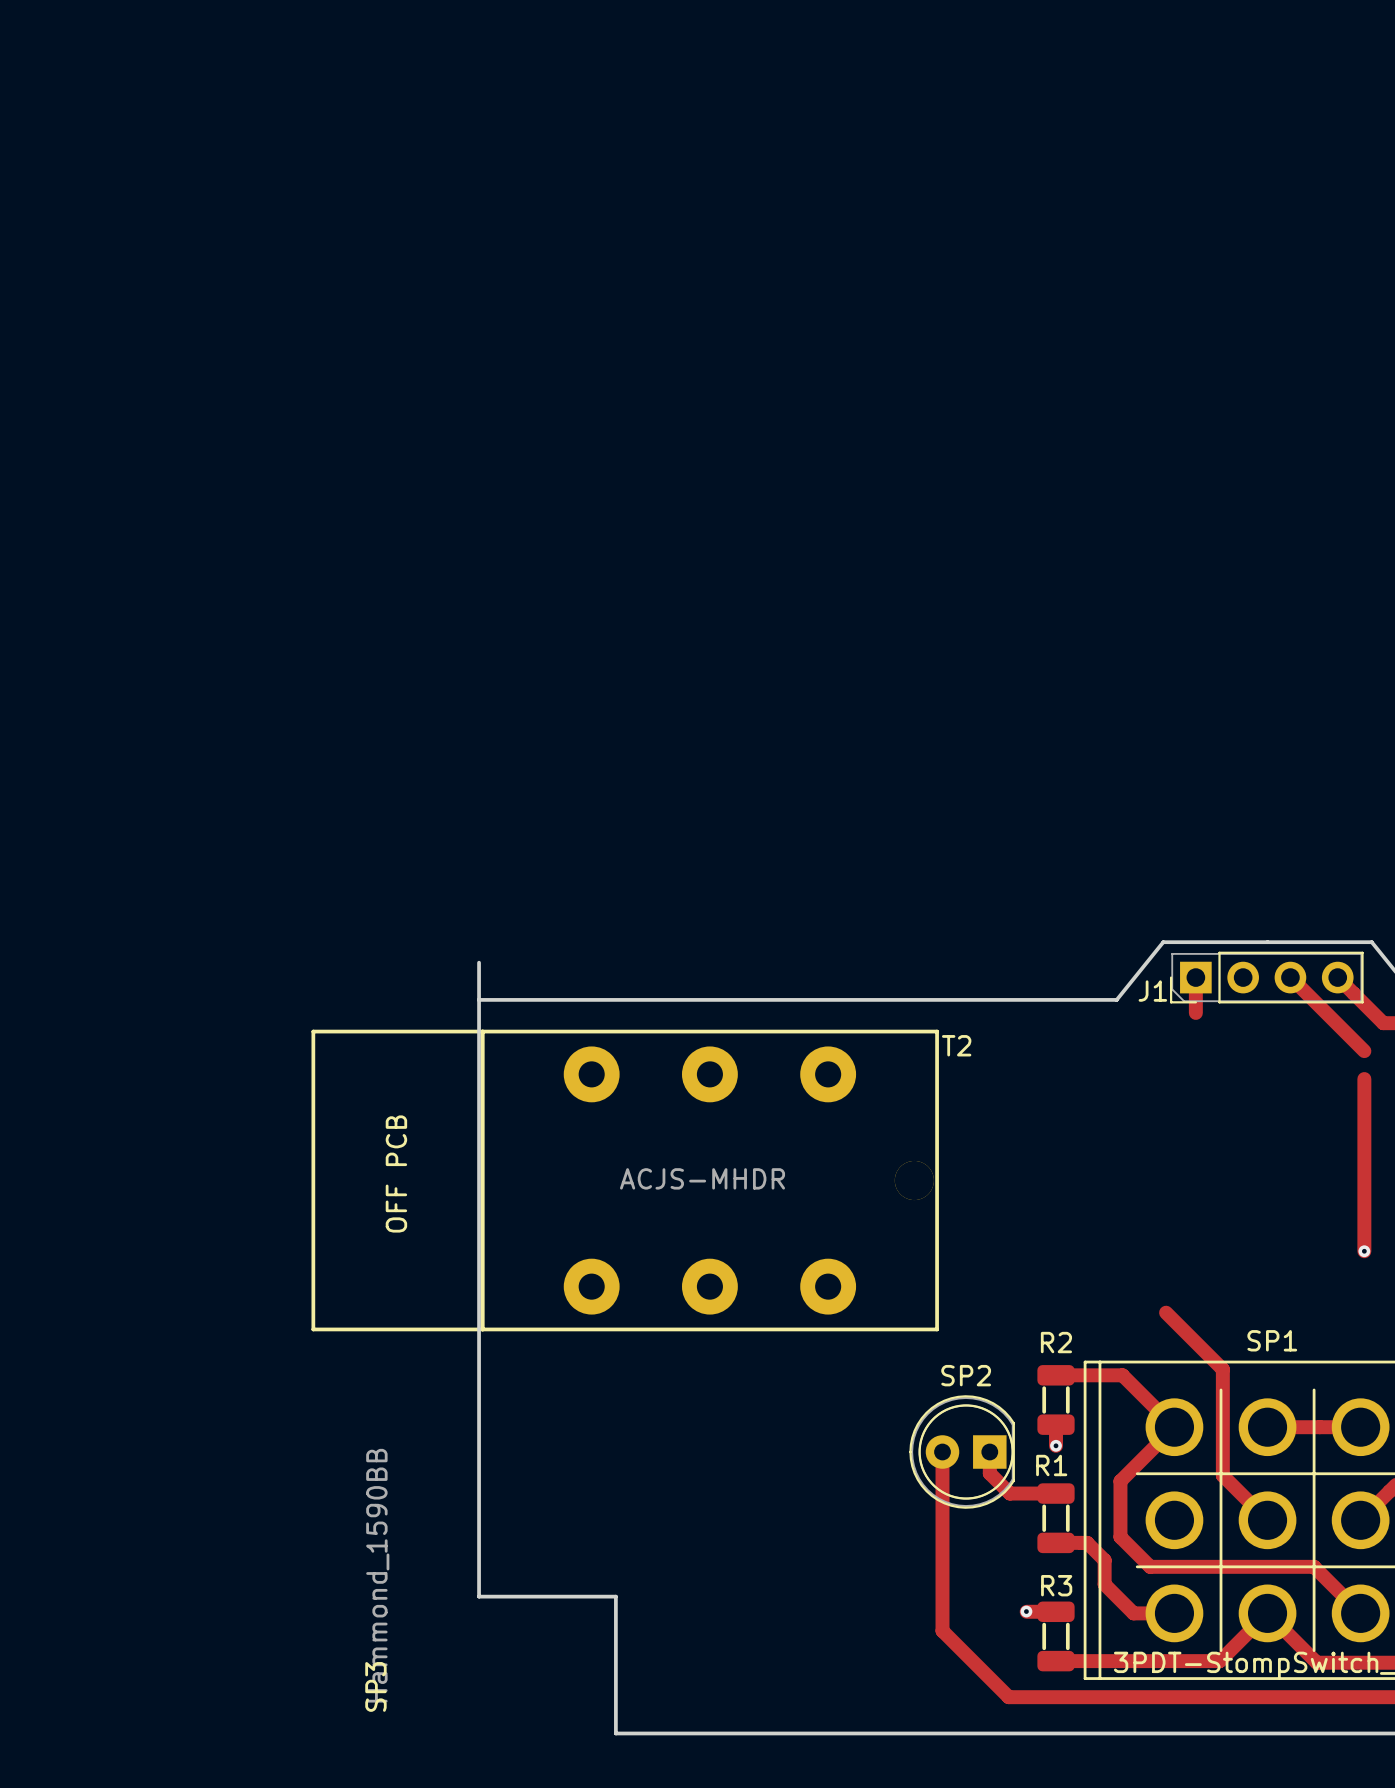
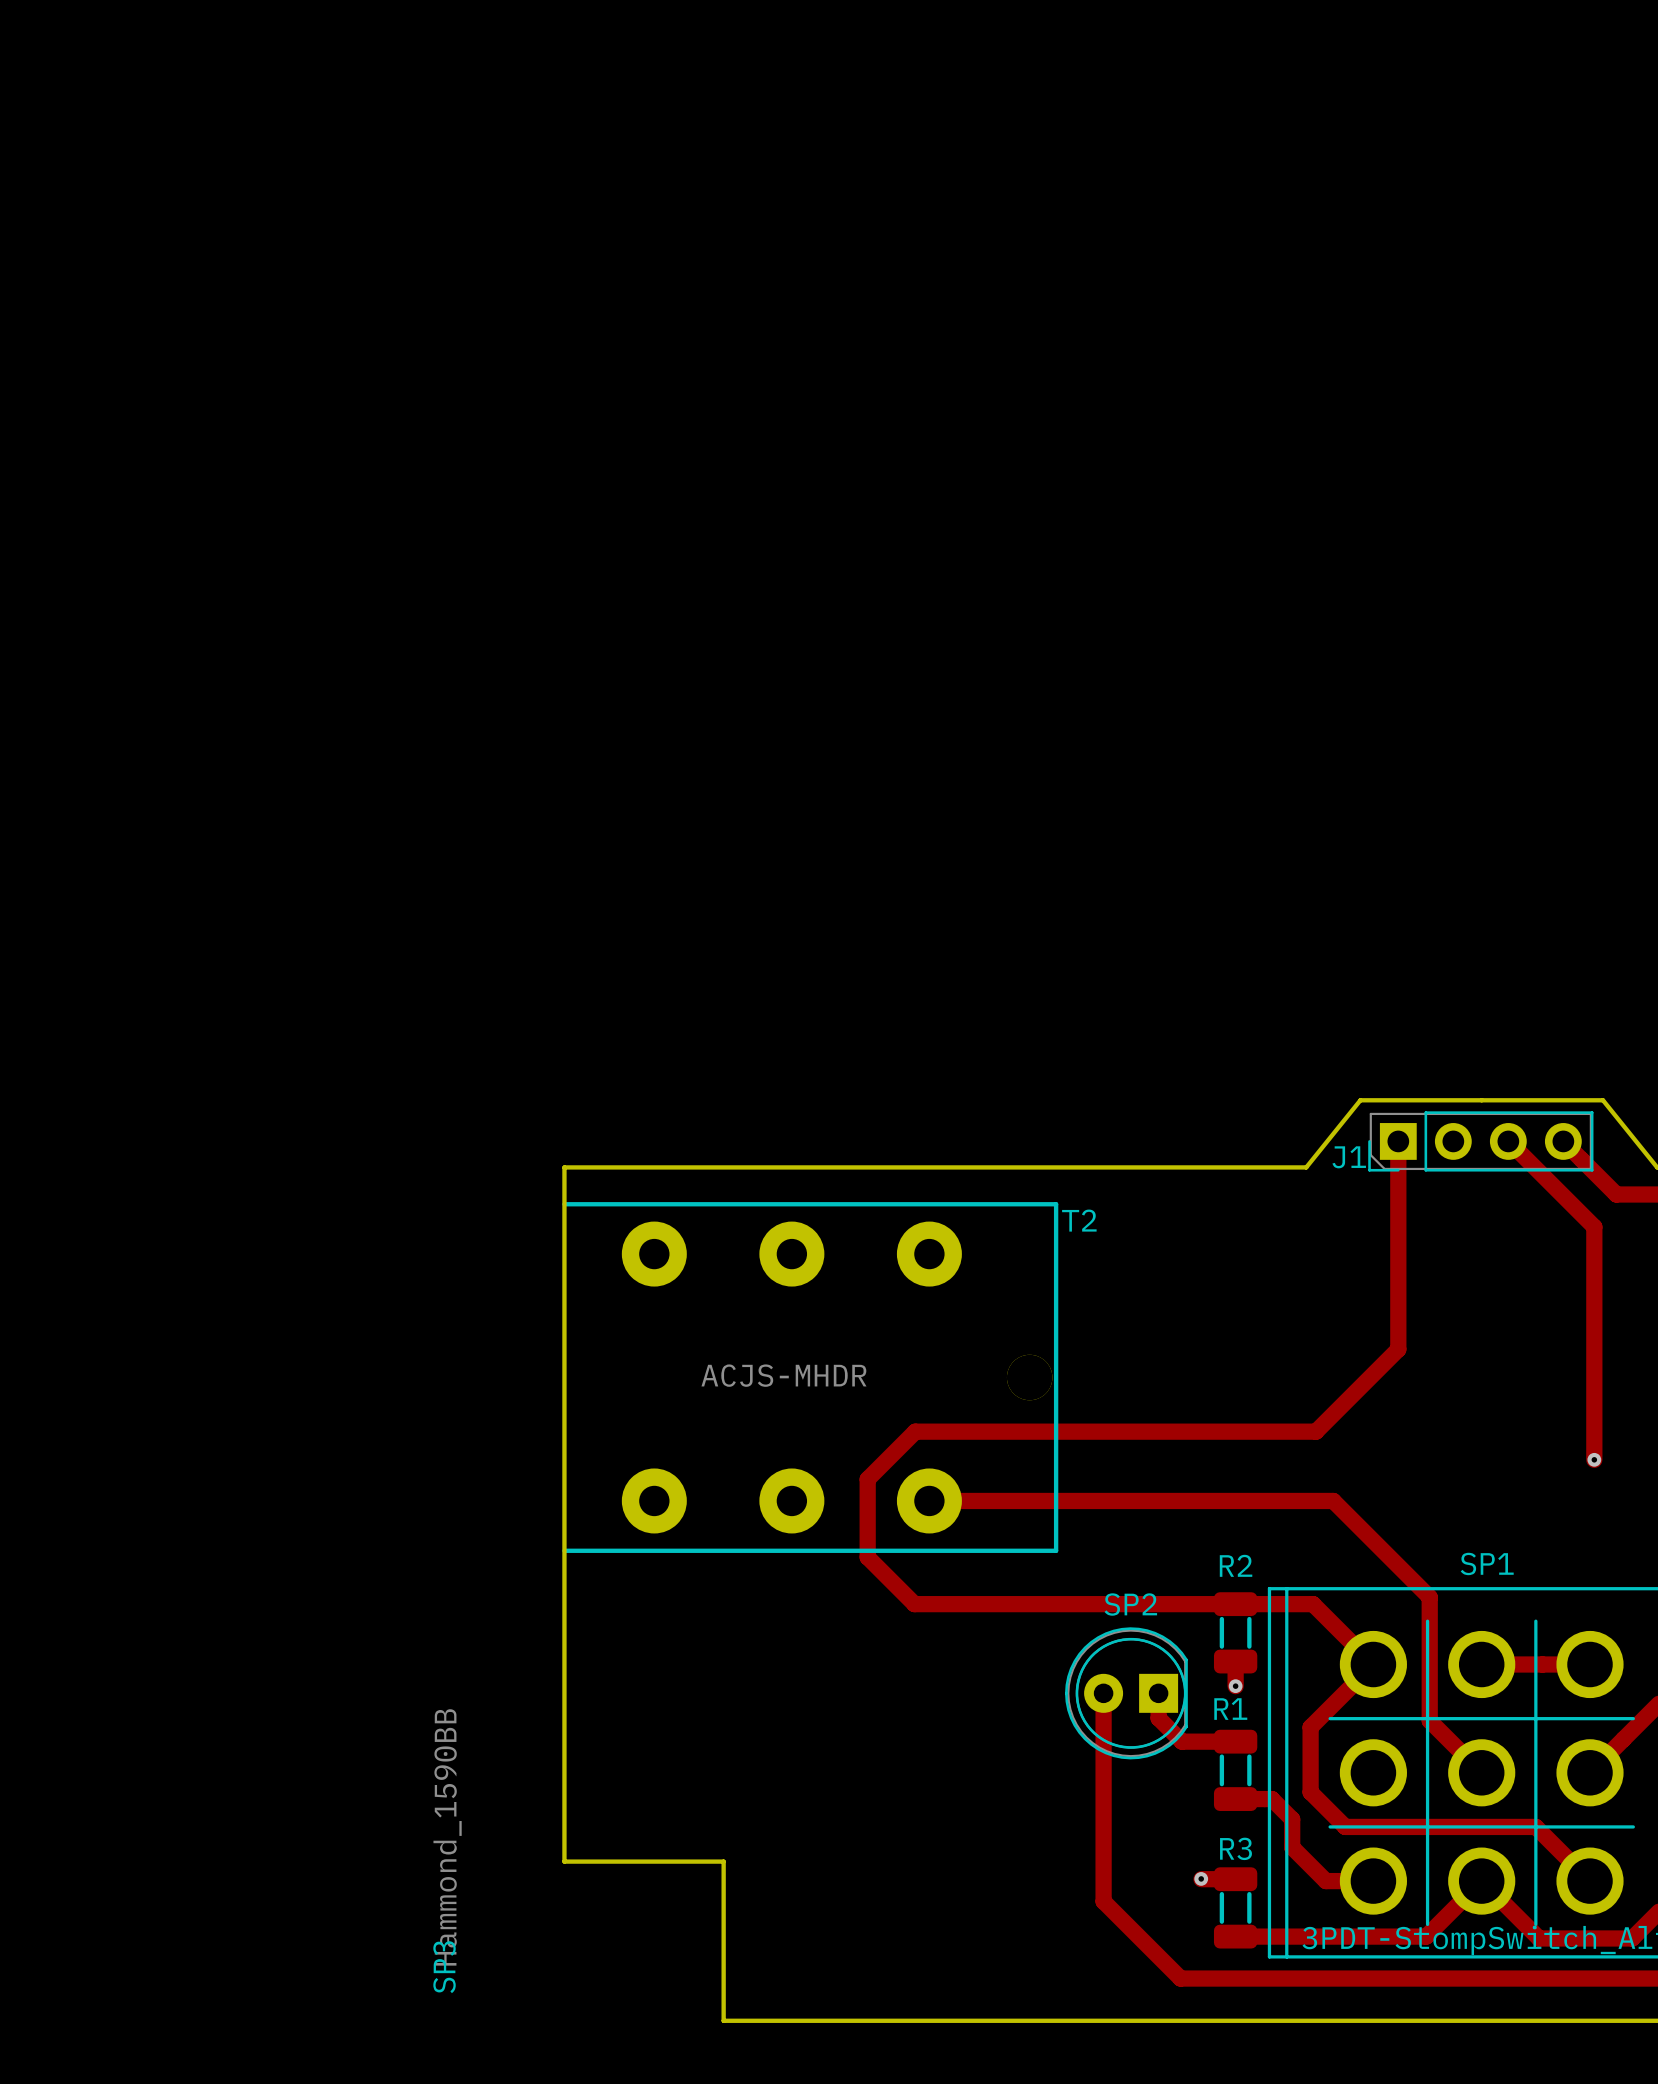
board edge: (479, 962) (479, 999) -> none
track: none -> (1398, 1182) (1398, 1349) (1316, 1431) (915, 1431) (867, 1479) (867, 1557) (914, 1604) (1235, 1604)
T2 footprint: [311, 1029, 939, 1332] -> [562, 1202, 1059, 1553]
T2 name position: T2 (956, 1045) -> T2 (1079, 1220)
track: none -> (1594, 1226) (1594, 1259)
T2 value position: ACJS-MHDR (702, 1178) -> ACJS-MHDR (783, 1375)
track: none -> (929, 1500) (1333, 1500) (1363, 1531)

